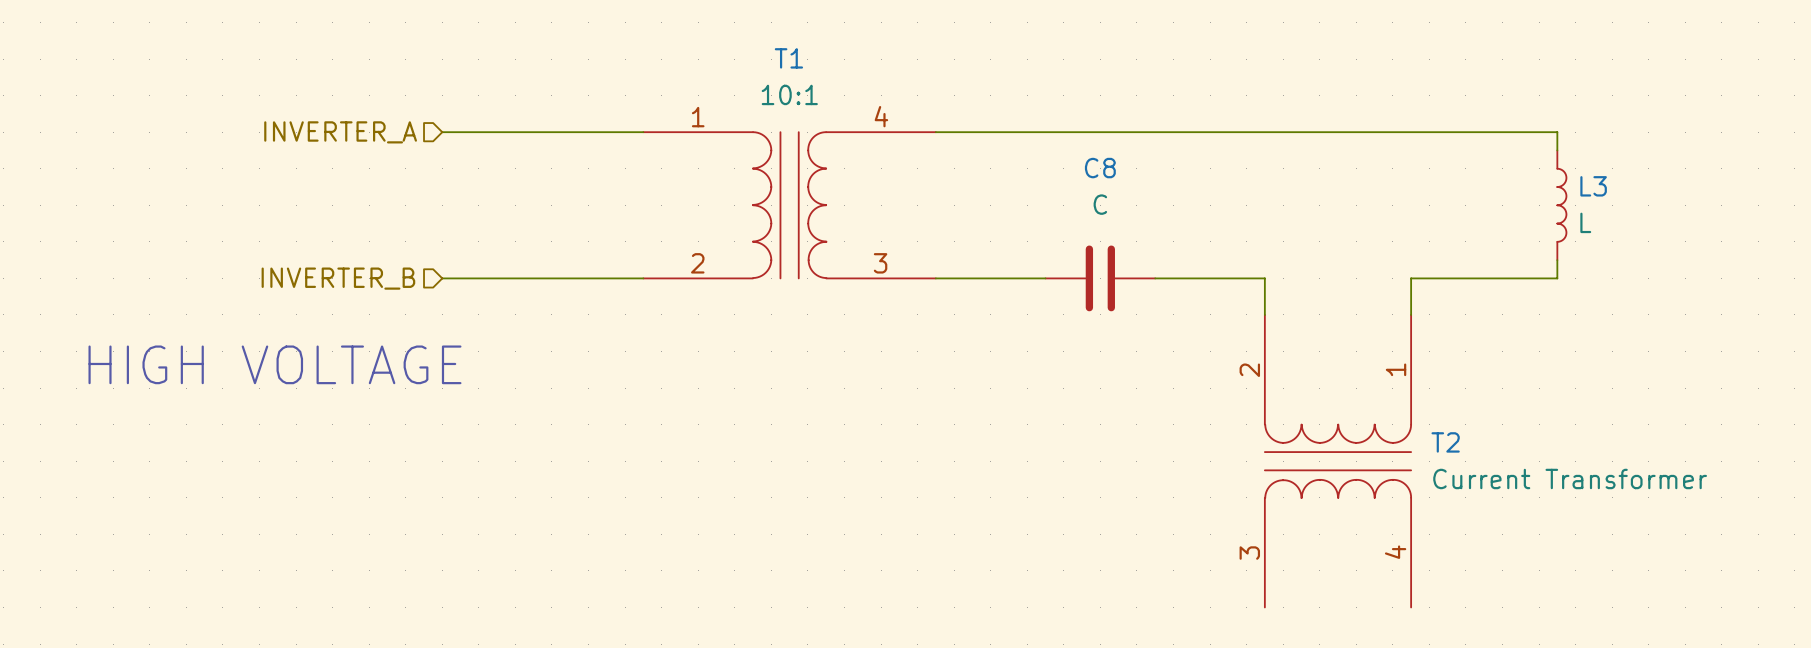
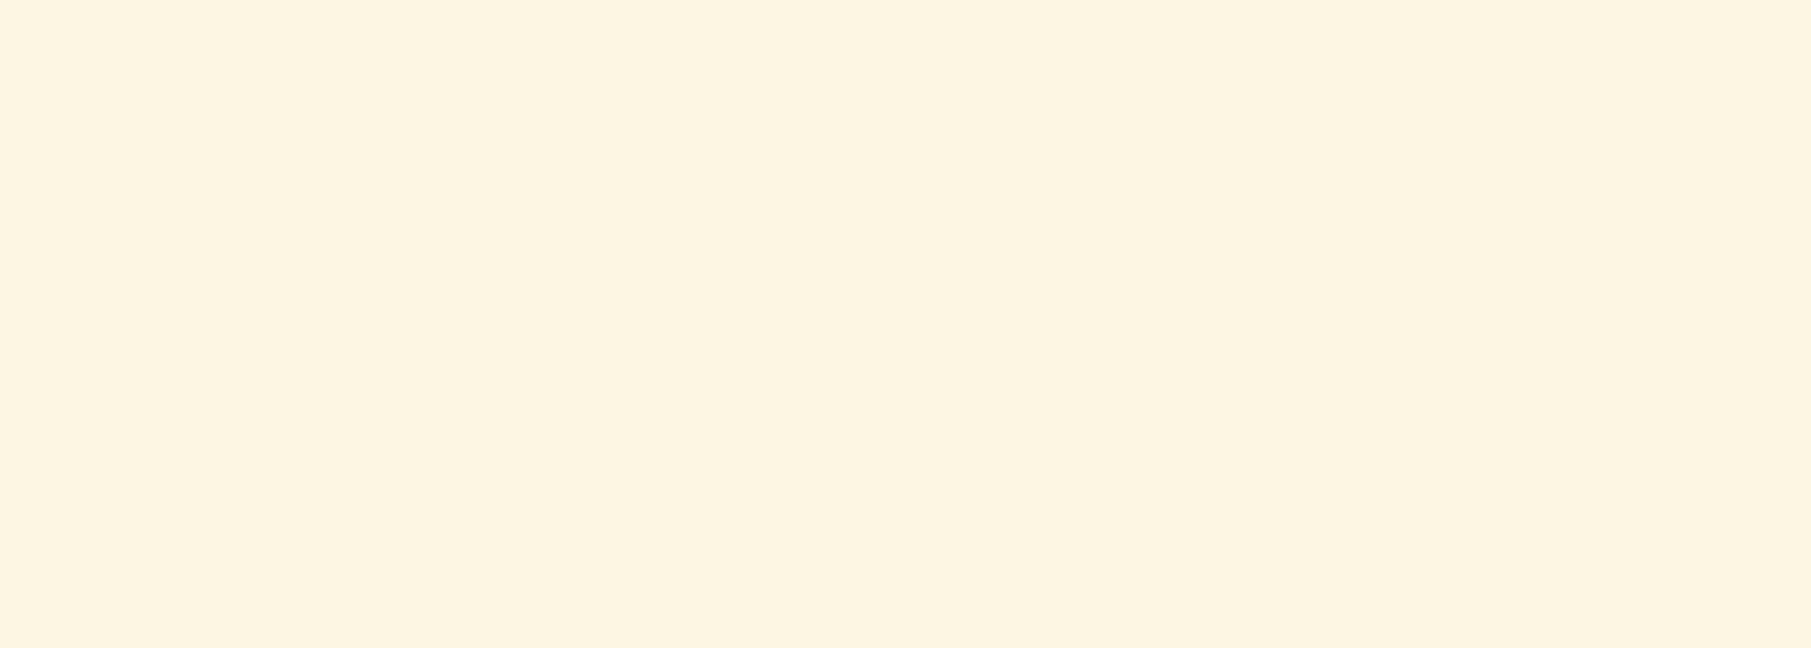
hierarchical label: INVERTER_A (340, 132) -> none
wire: (442, 132) (643, 132) -> none
wire: (935, 132) (1557, 132) (1557, 150) -> none
T1: 10:1 (789, 205) -> none
L3: L (1561, 205) -> none
wire: (1557, 260) (1557, 278) (1411, 278) (1411, 314) -> none
hierarchical label: INVERTER_B (338, 278) -> none
wire: (442, 278) (643, 278) -> none
wire: (935, 278) (1045, 278) -> none
C8: C (1100, 278) -> none
wire: (1155, 278) (1264, 278) (1264, 314) -> none
text: HIGH VOLTAGE (274, 364) -> none
T2: Current Transformer (1337, 461) -> none

